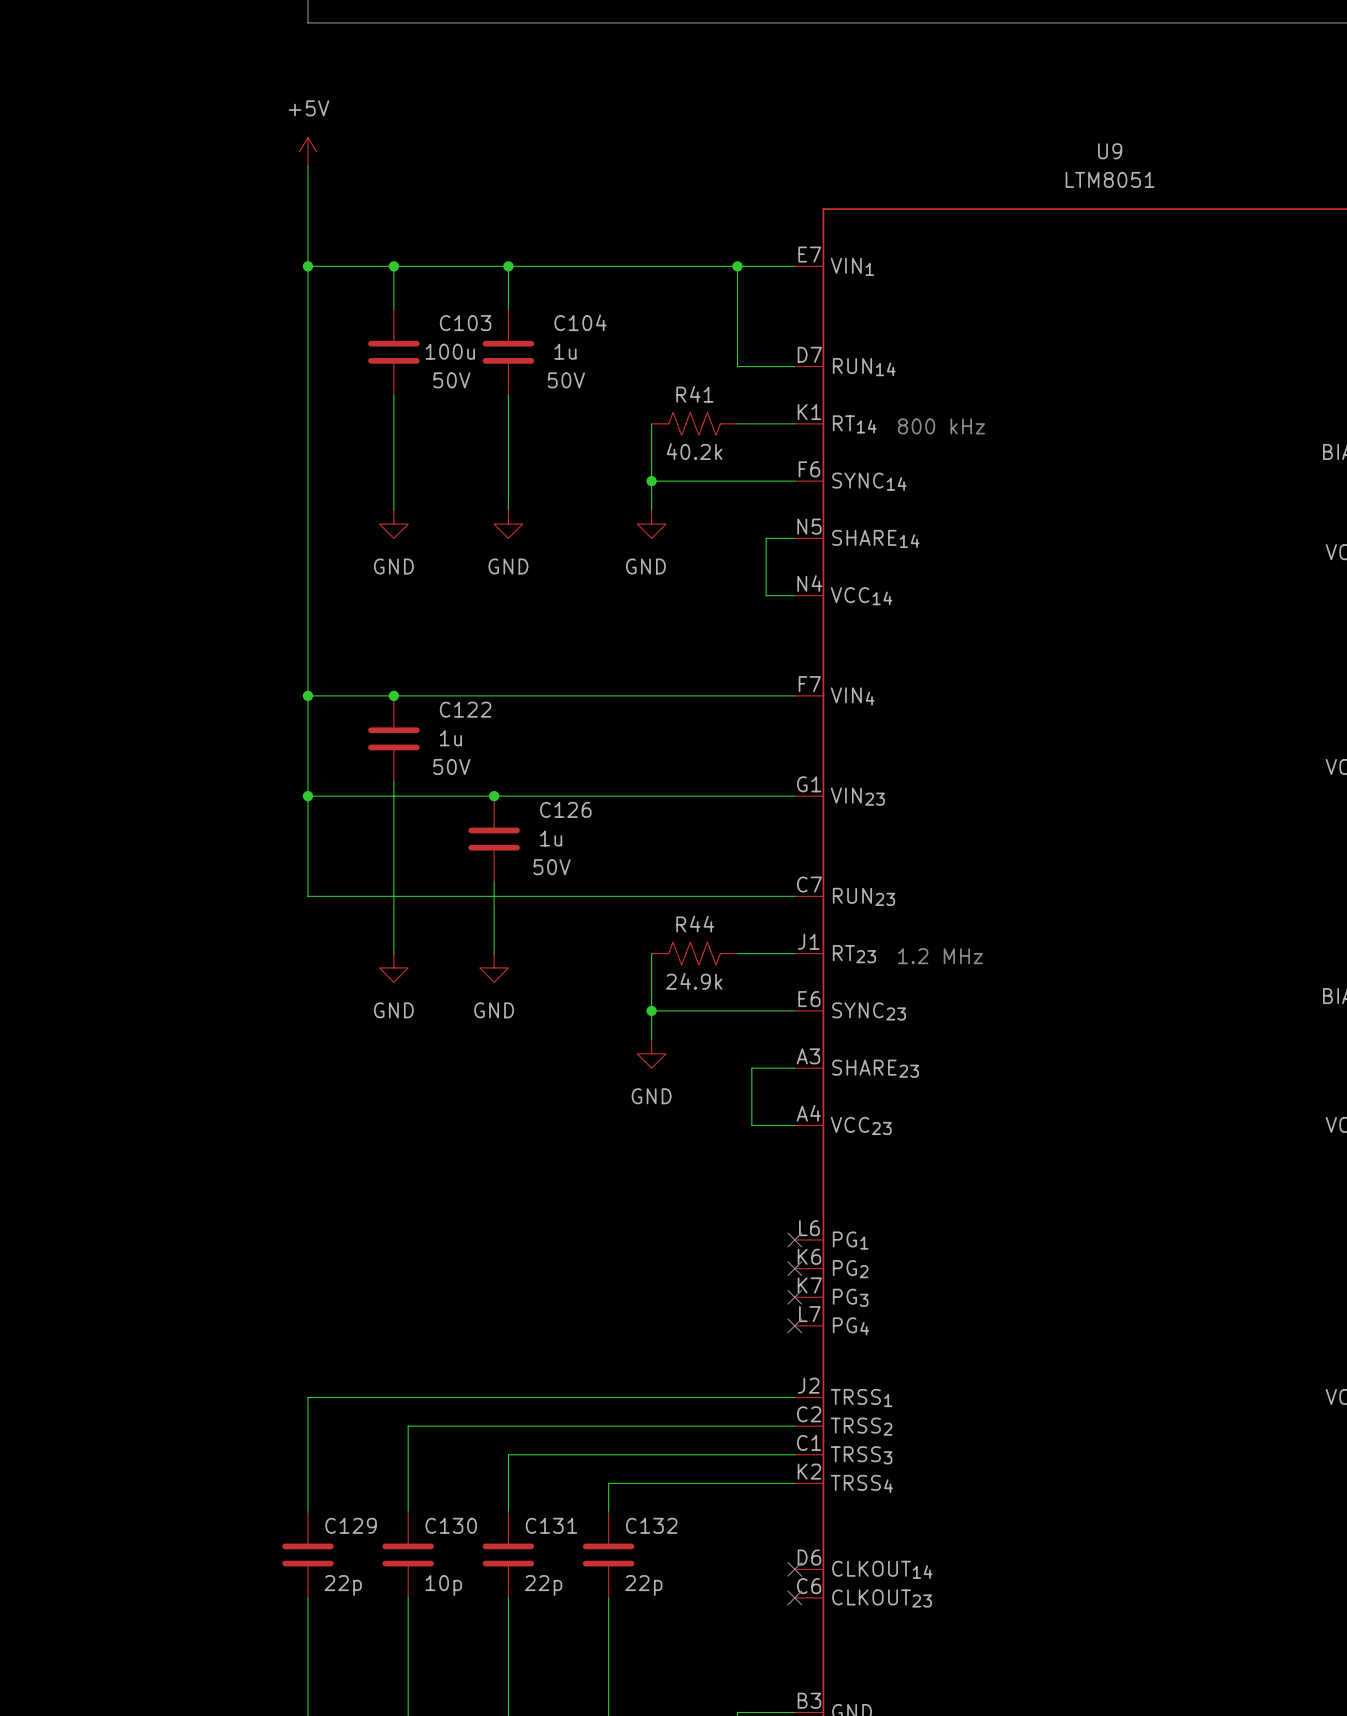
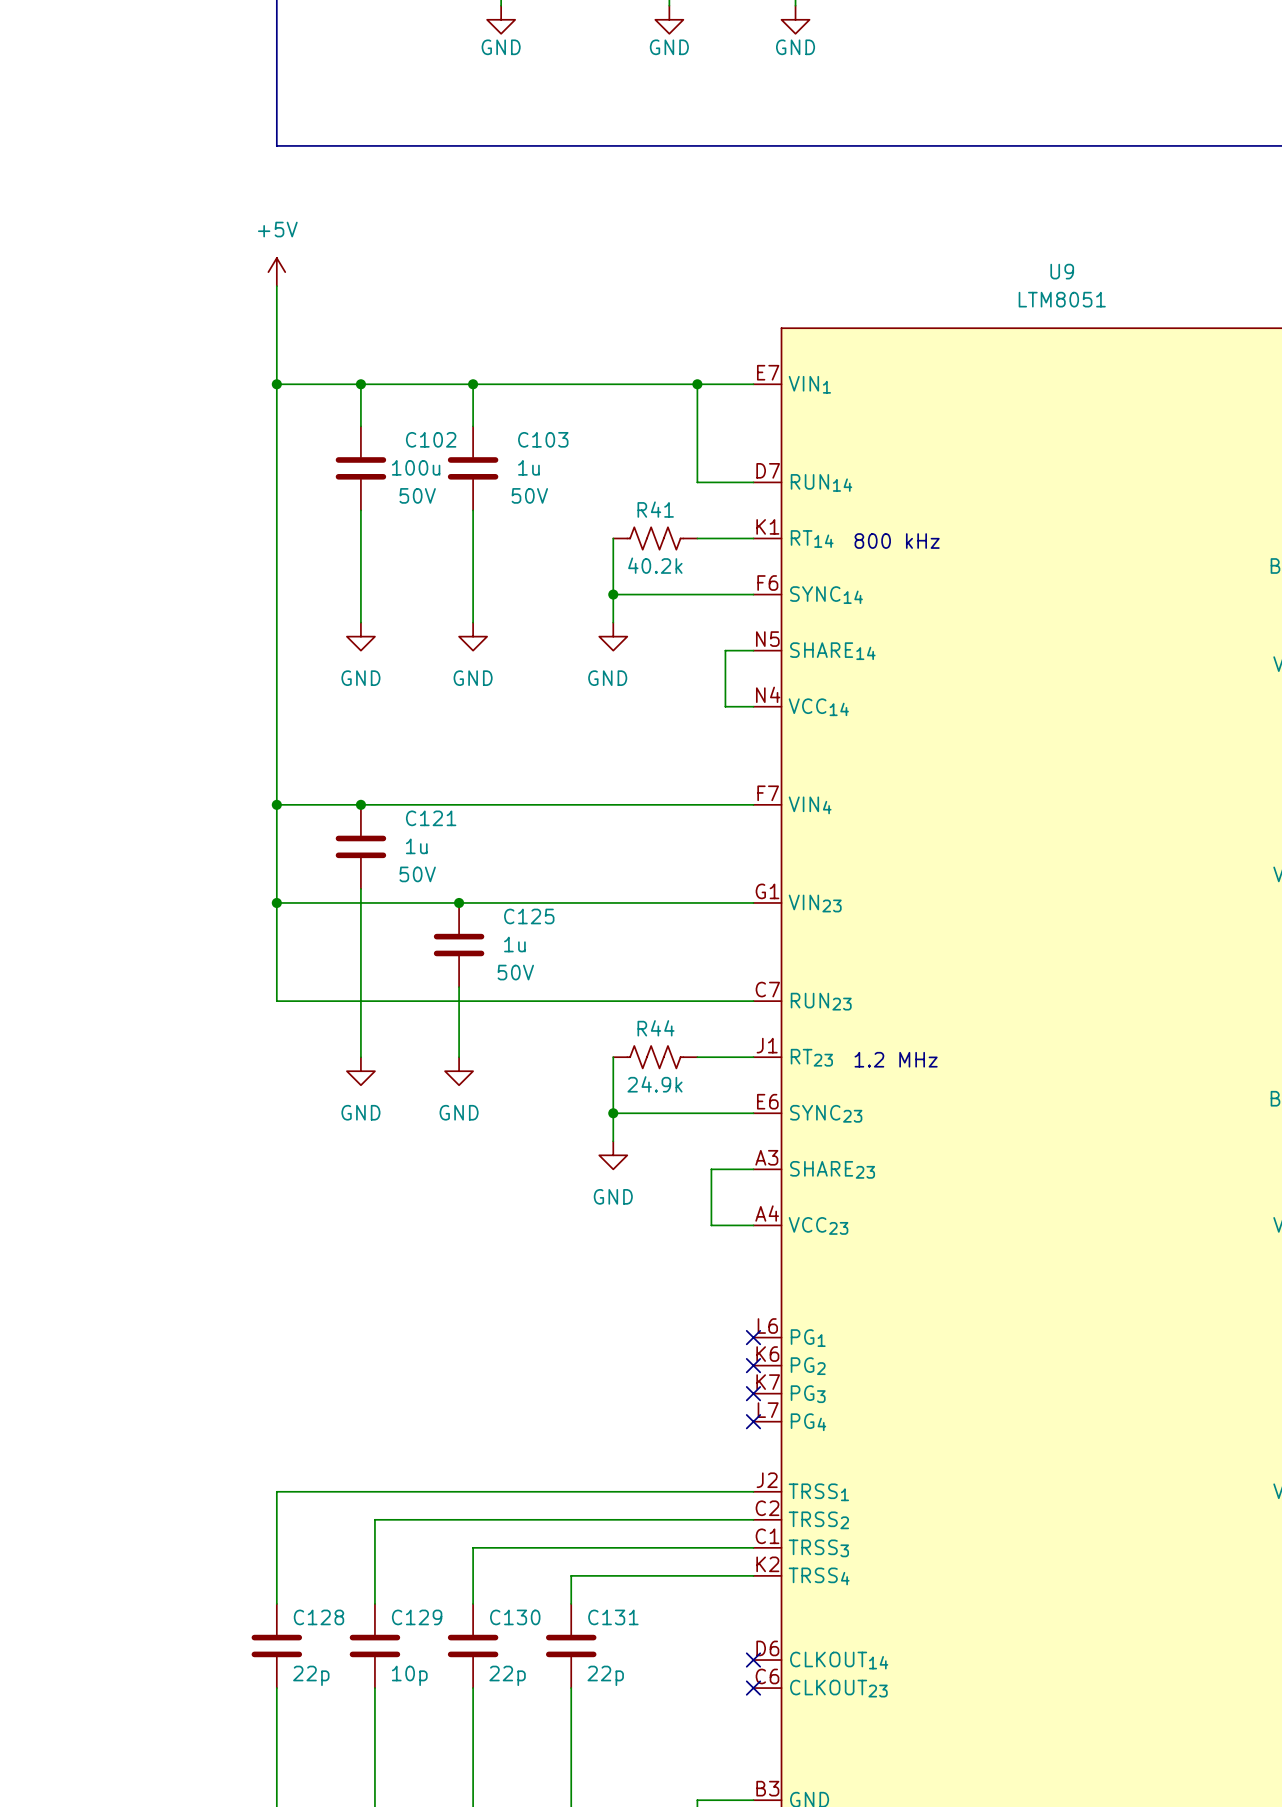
C104 name: C104 (580, 322) -> C103 (543, 439)
C103 name: C103 (465, 323) -> C102 (431, 439)
C122 name: C122 (465, 709) -> C121 (431, 818)
C126 name: C126 (565, 809) -> C125 (529, 916)
C129 name: C129 (351, 1525) -> C128 (318, 1617)
C130 name: C130 (451, 1525) -> C129 (417, 1617)
C131 name: C131 (551, 1525) -> C130 (515, 1617)
C132 name: C132 (651, 1525) -> C131 (613, 1617)

